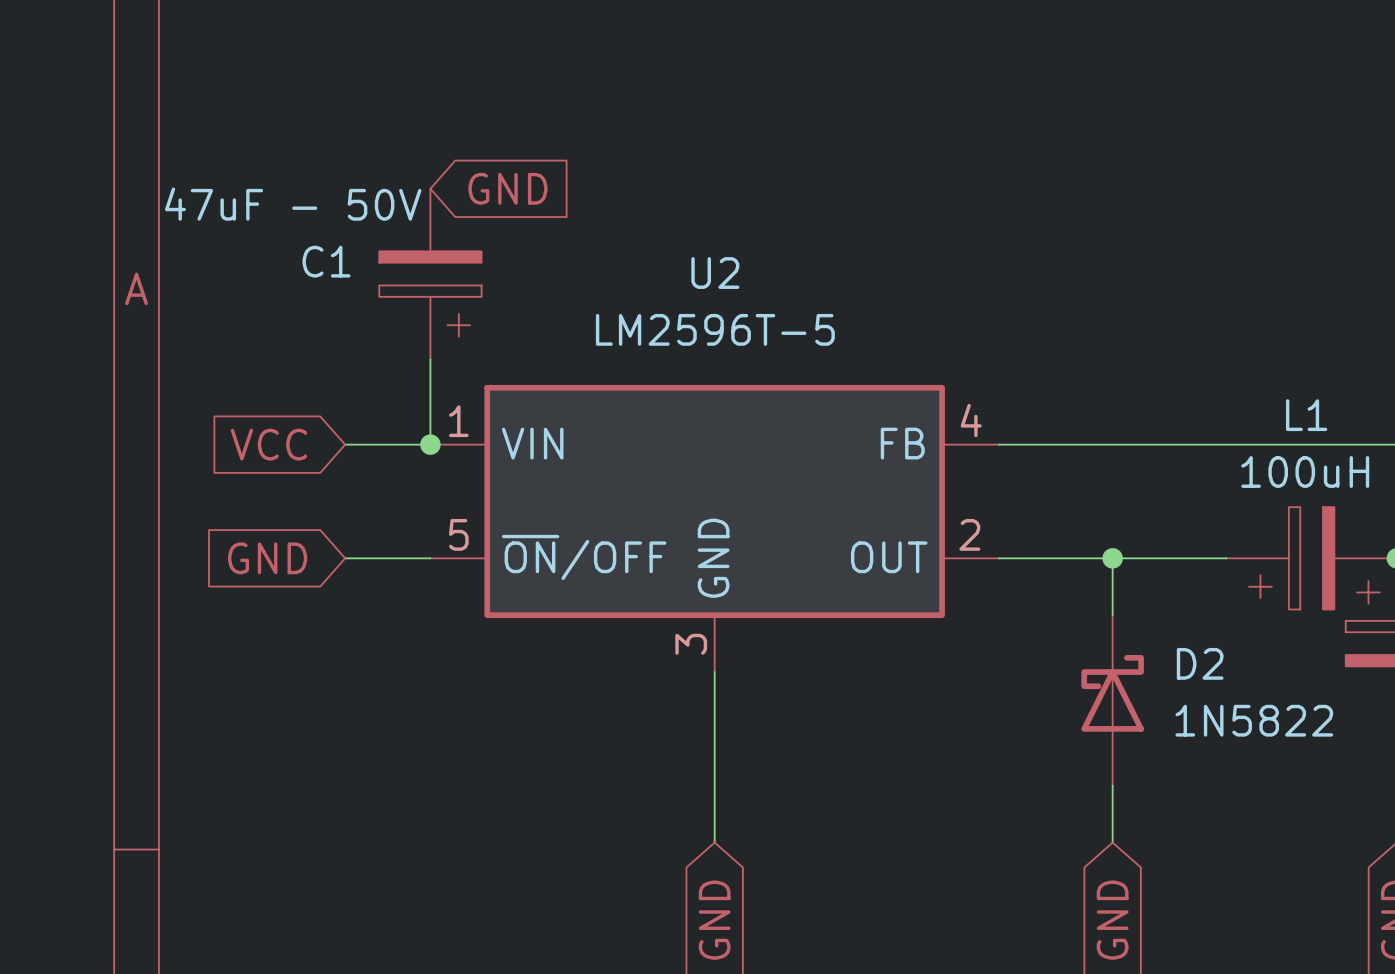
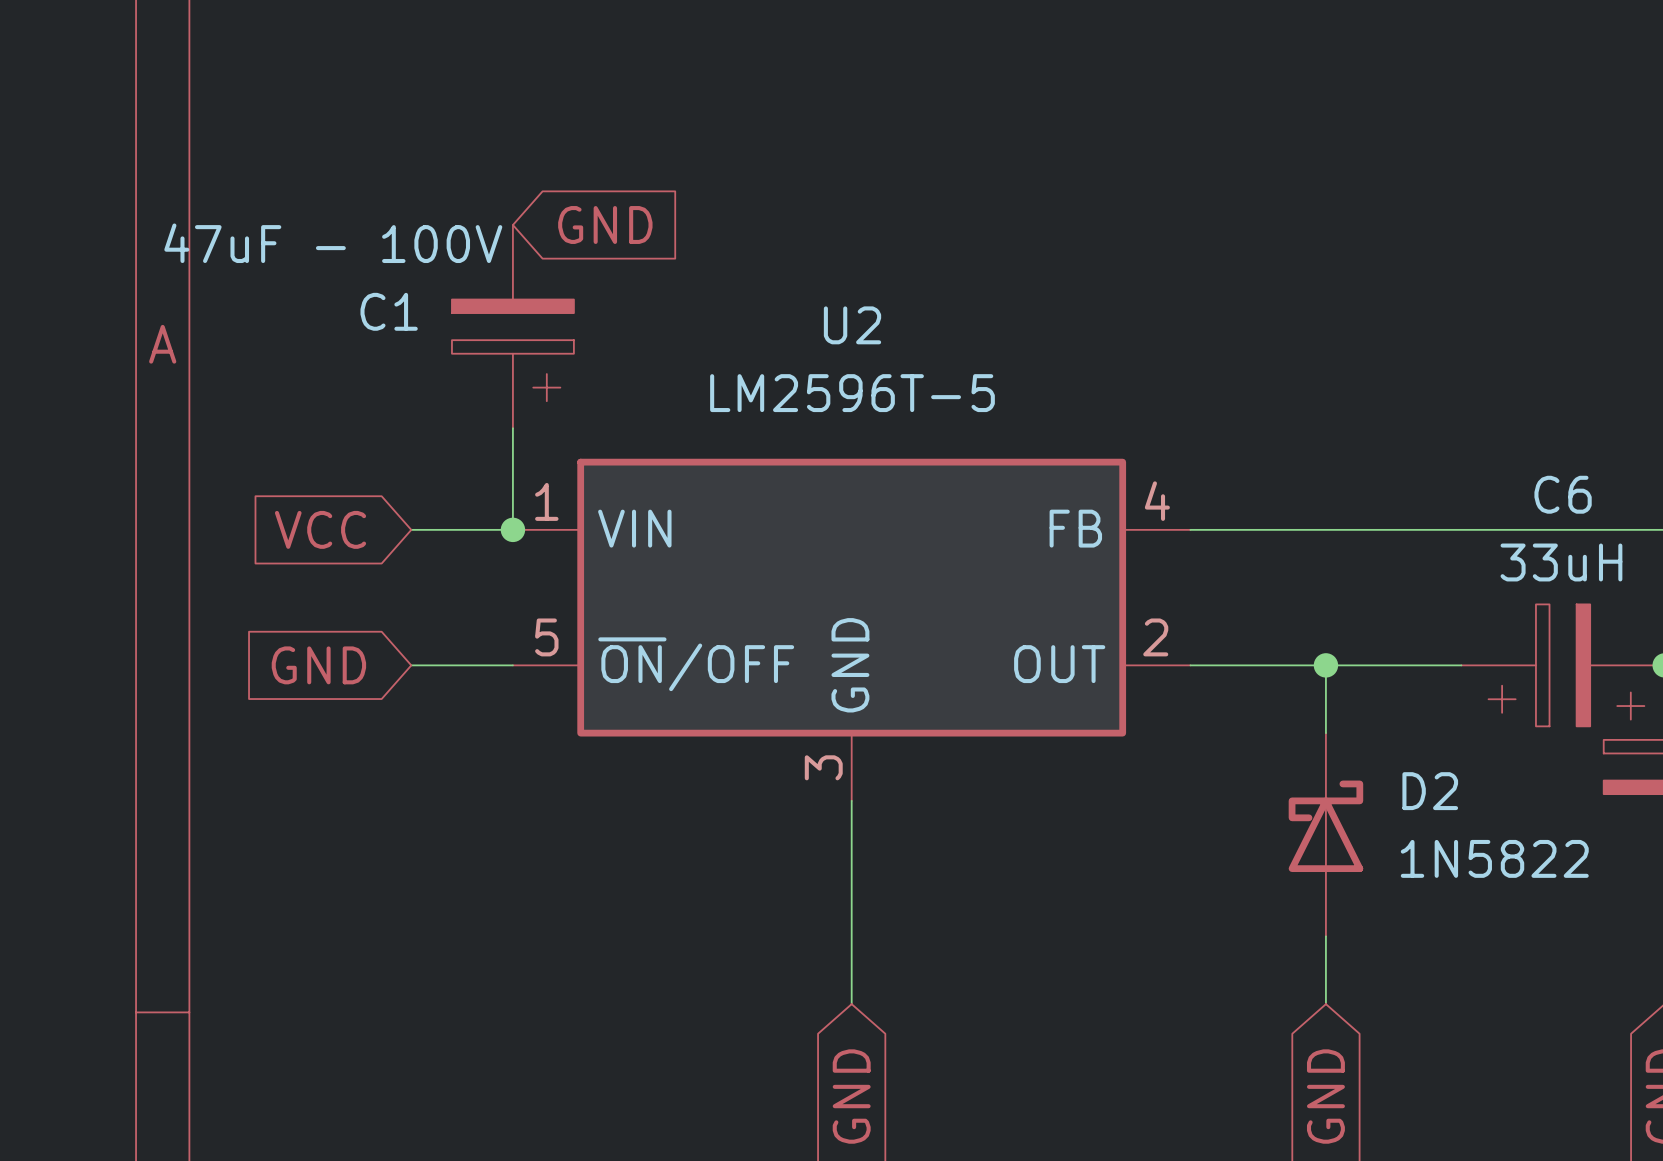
C1 value: 47uF - 50V (293, 204) -> 47uF - 100V (333, 243)
L1 name: L1 (1306, 415) -> C6 (1563, 494)
L1 value: 100uH (1305, 472) -> 33uH (1561, 562)

